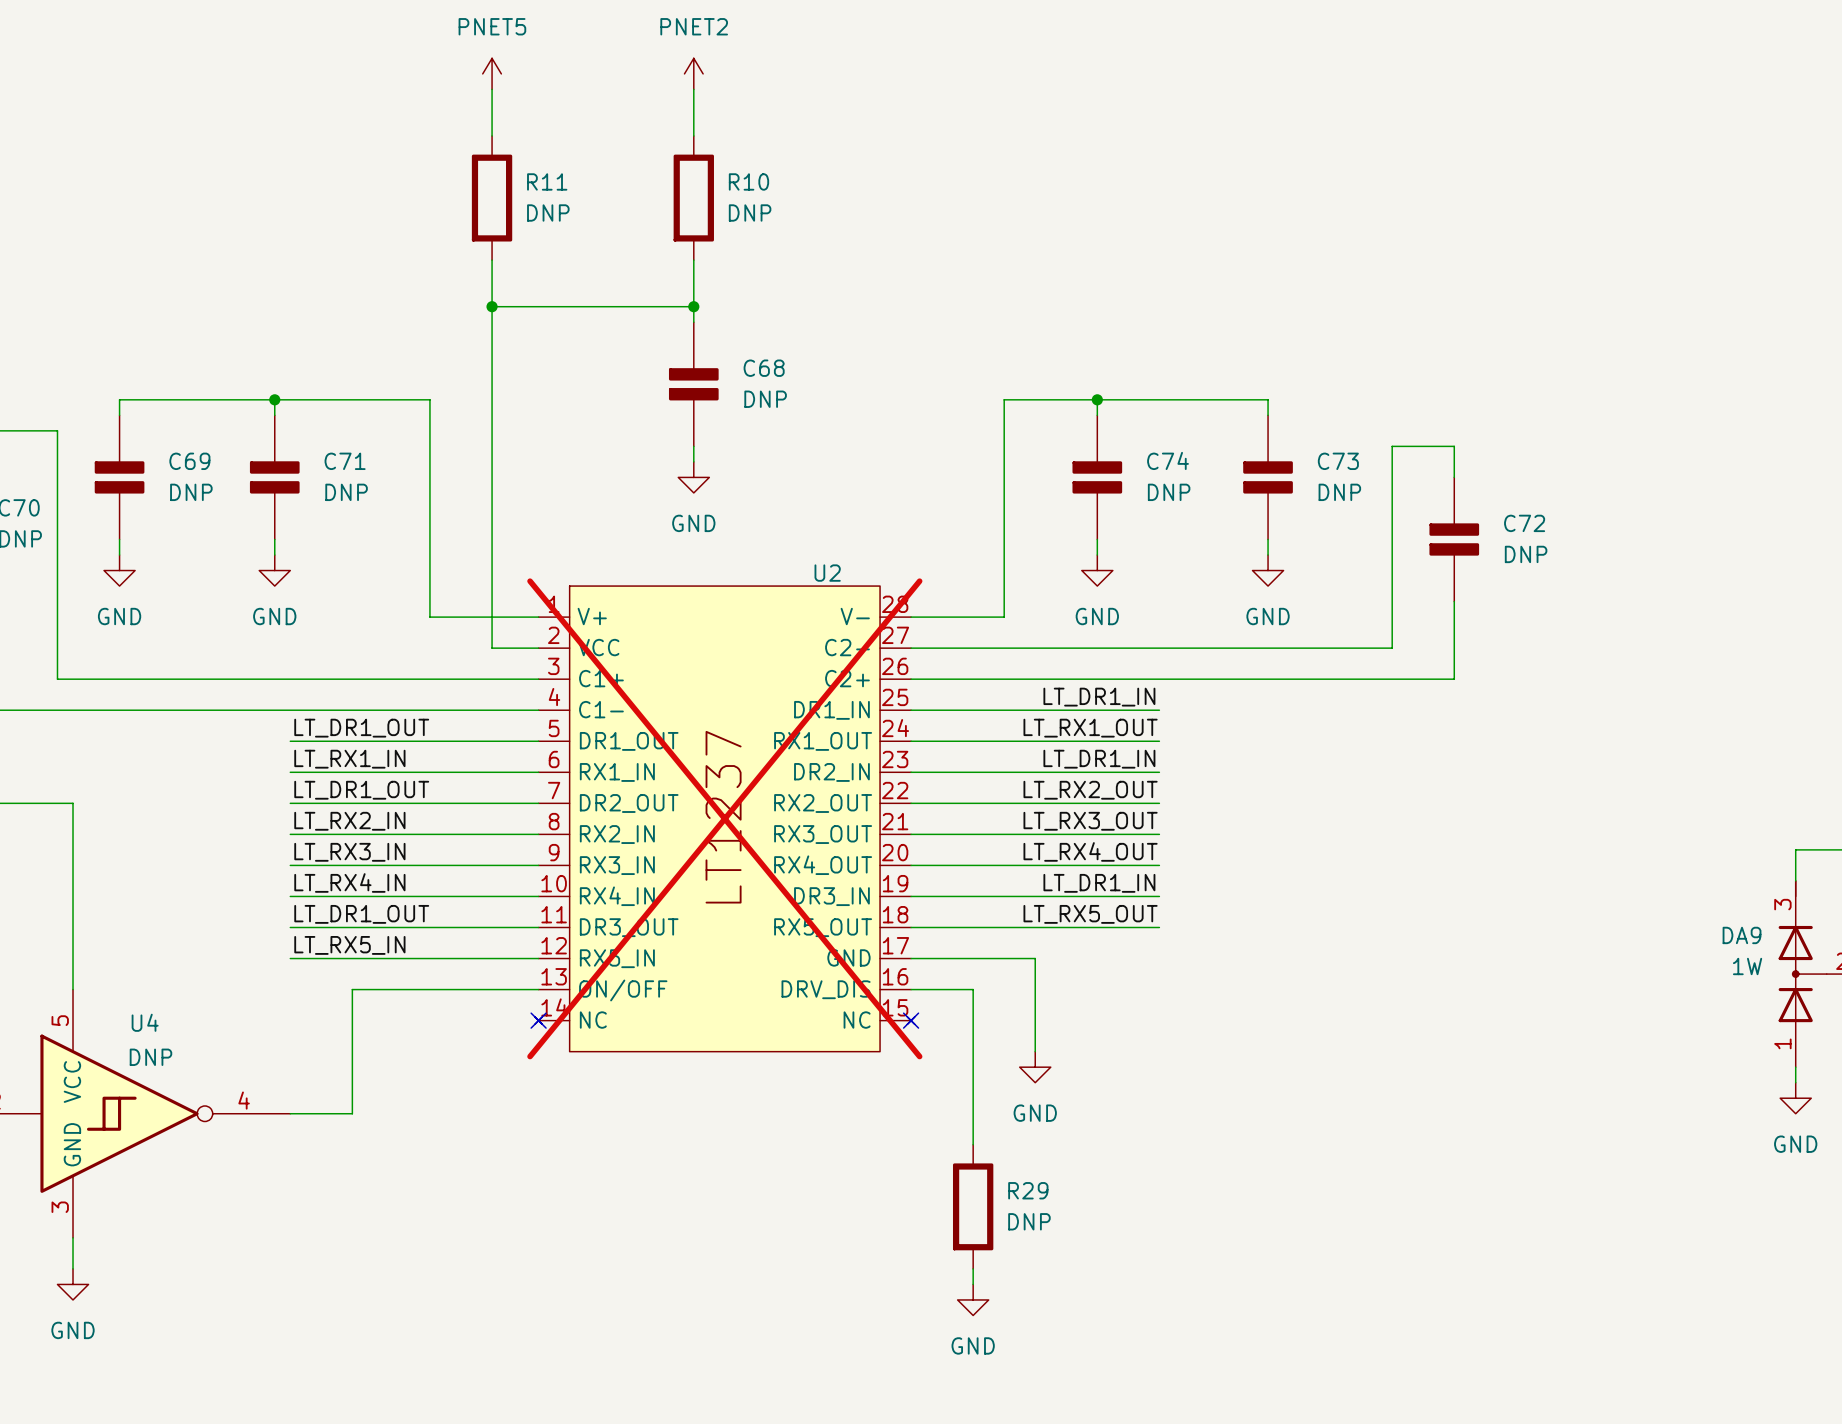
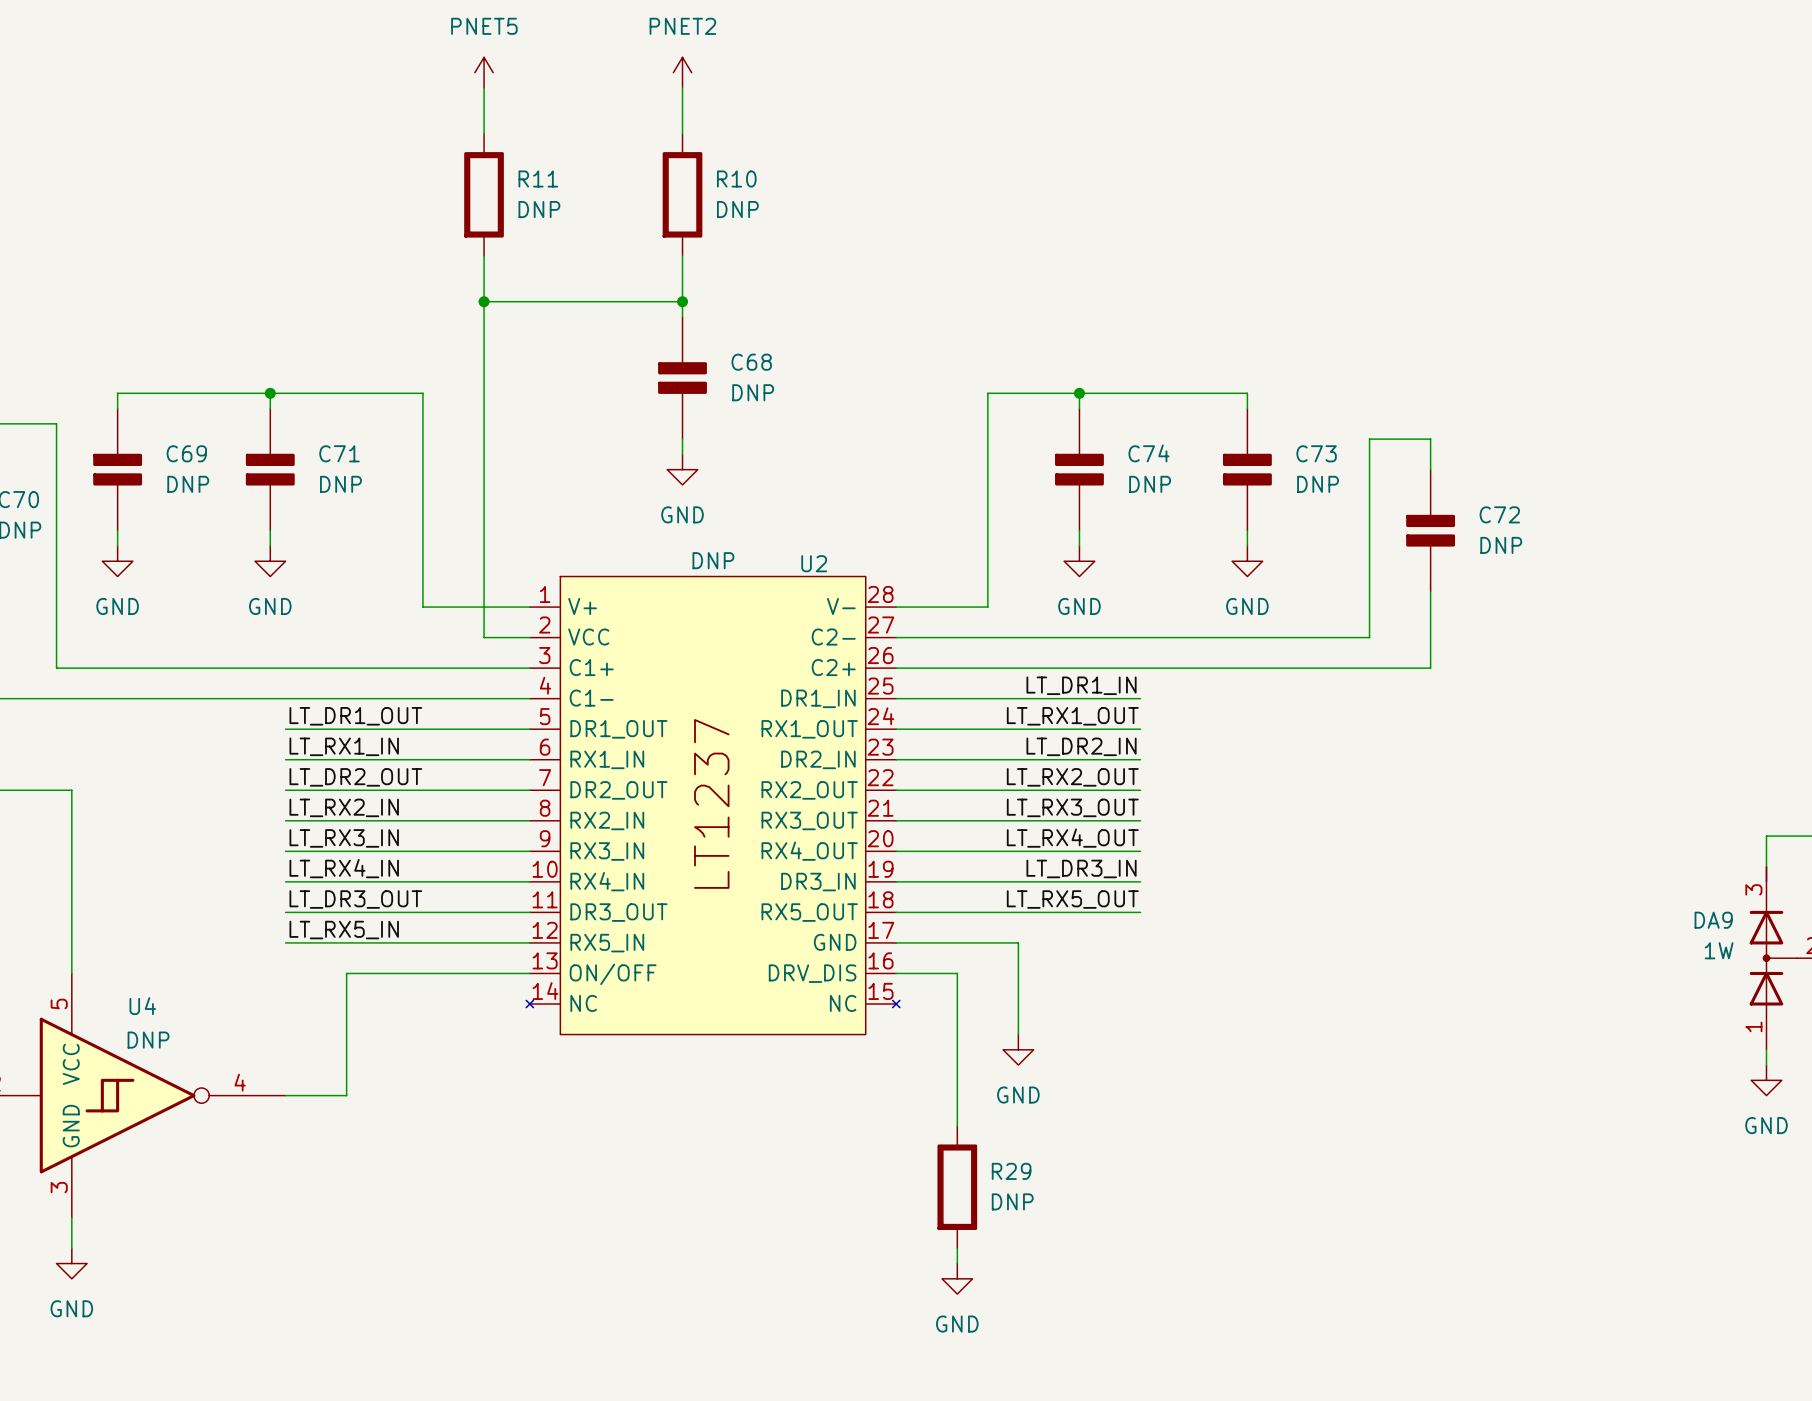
U2 value: none -> DNP (713, 560)
label: LT_DR1_IN (1099, 759) -> LT_DR2_IN (1081, 746)
label: LT_DR1_OUT (361, 790) -> LT_DR2_OUT (355, 777)
U2 do-not-place cross: (724, 818) -> none
label: LT_DR1_IN (1099, 883) -> LT_DR3_IN (1081, 868)
label: LT_DR1_OUT (361, 914) -> LT_DR3_OUT (355, 899)
no-connect mark: (538, 1020) -> none
no-connect mark: (911, 1020) -> none

